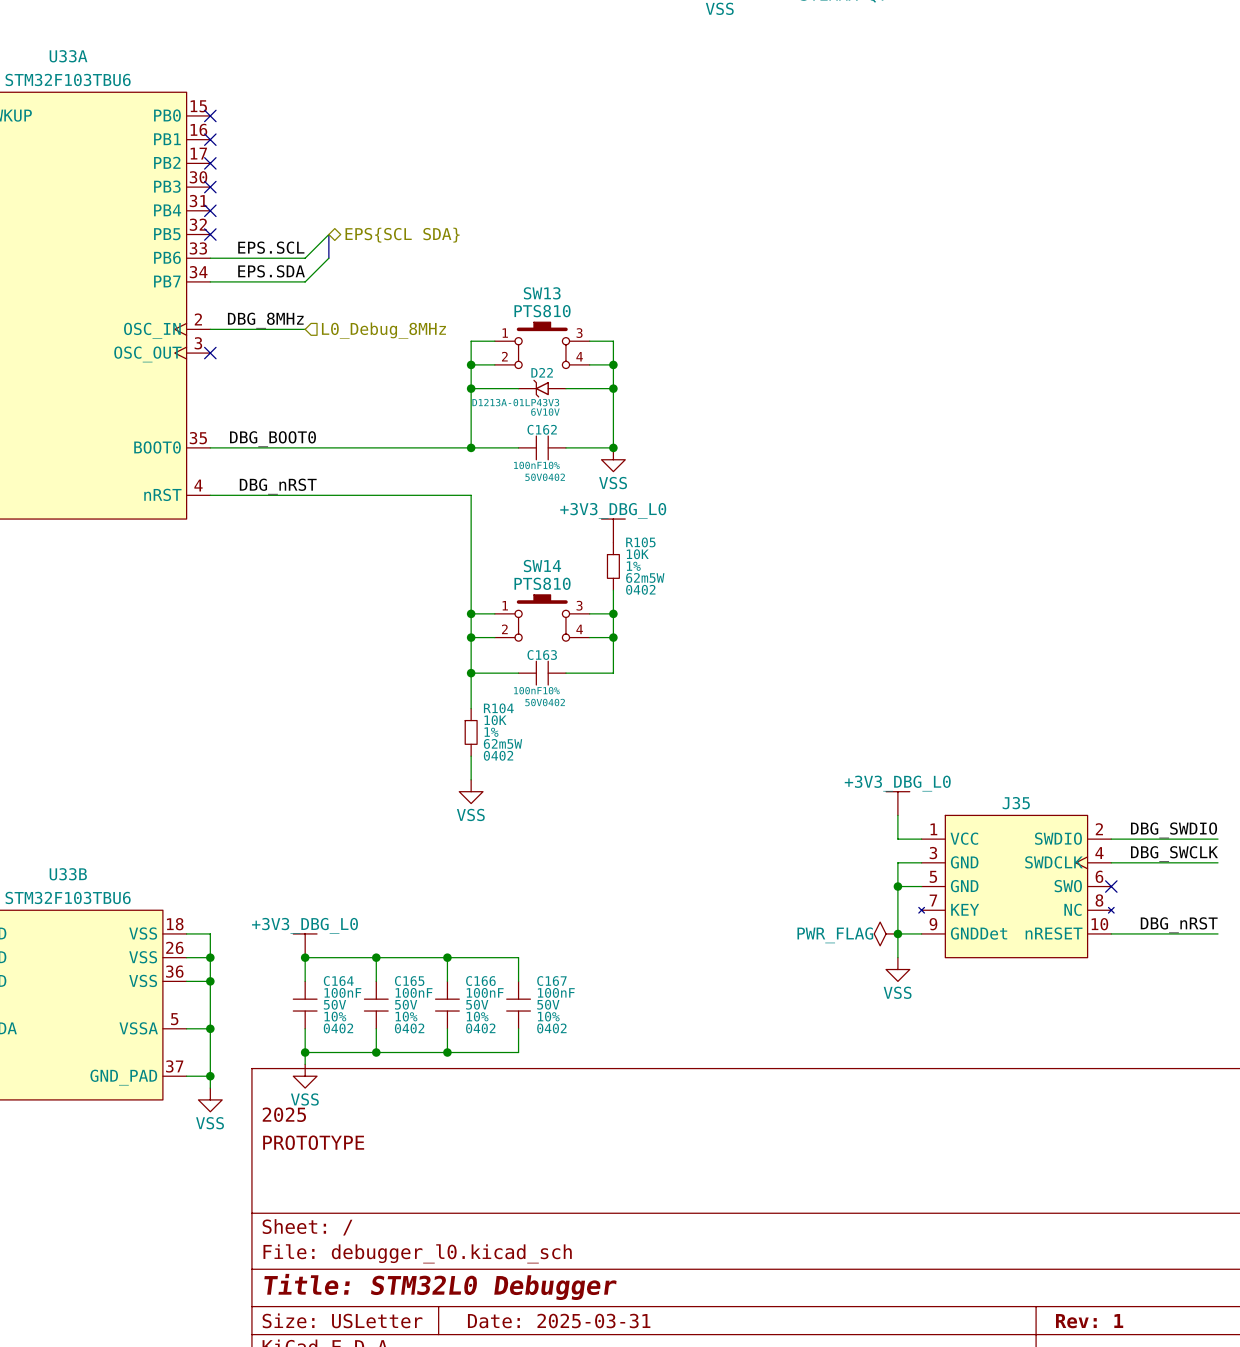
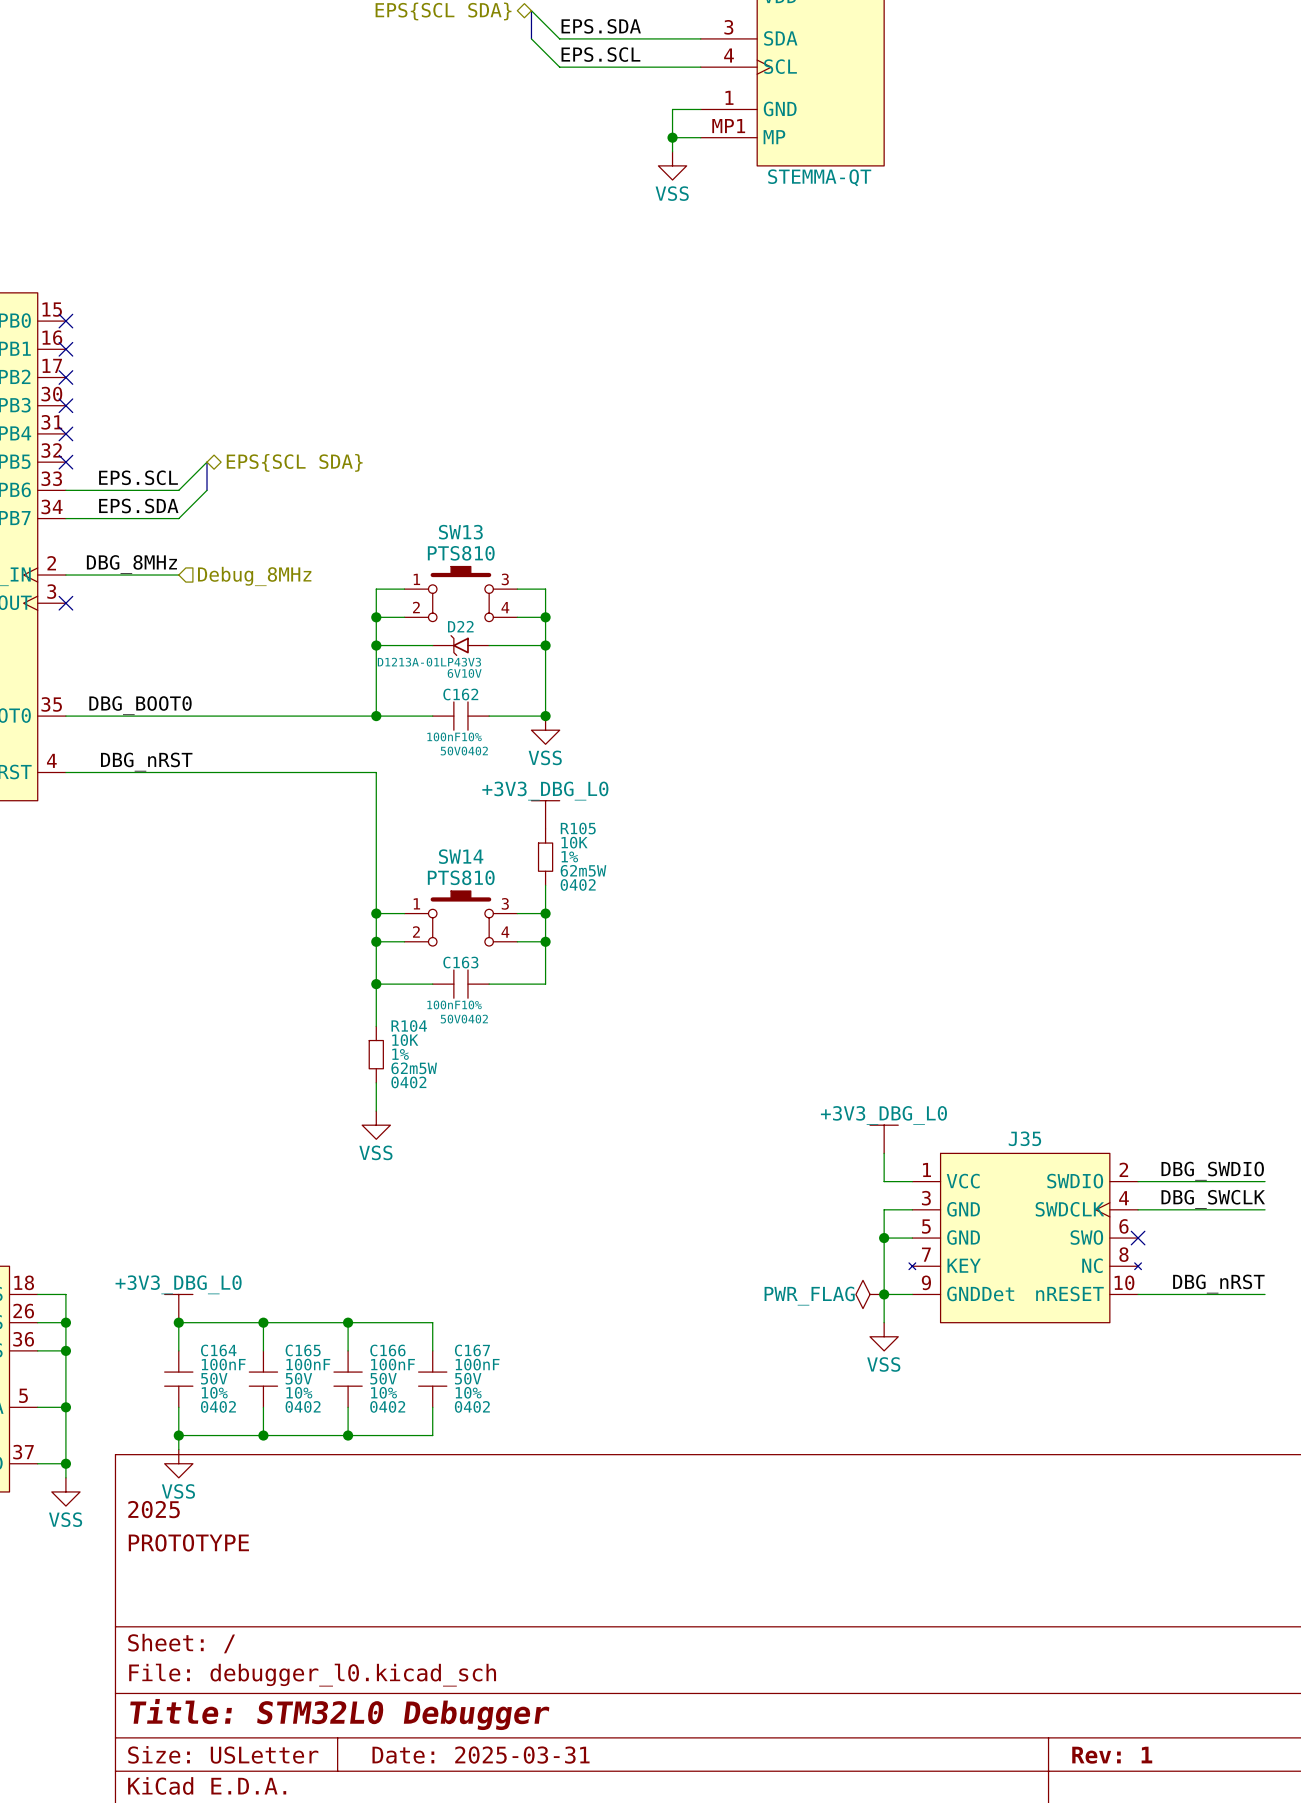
hierarchical label: L0_Debug_8MHz (383, 330) -> Debug_8MHz (254, 576)

